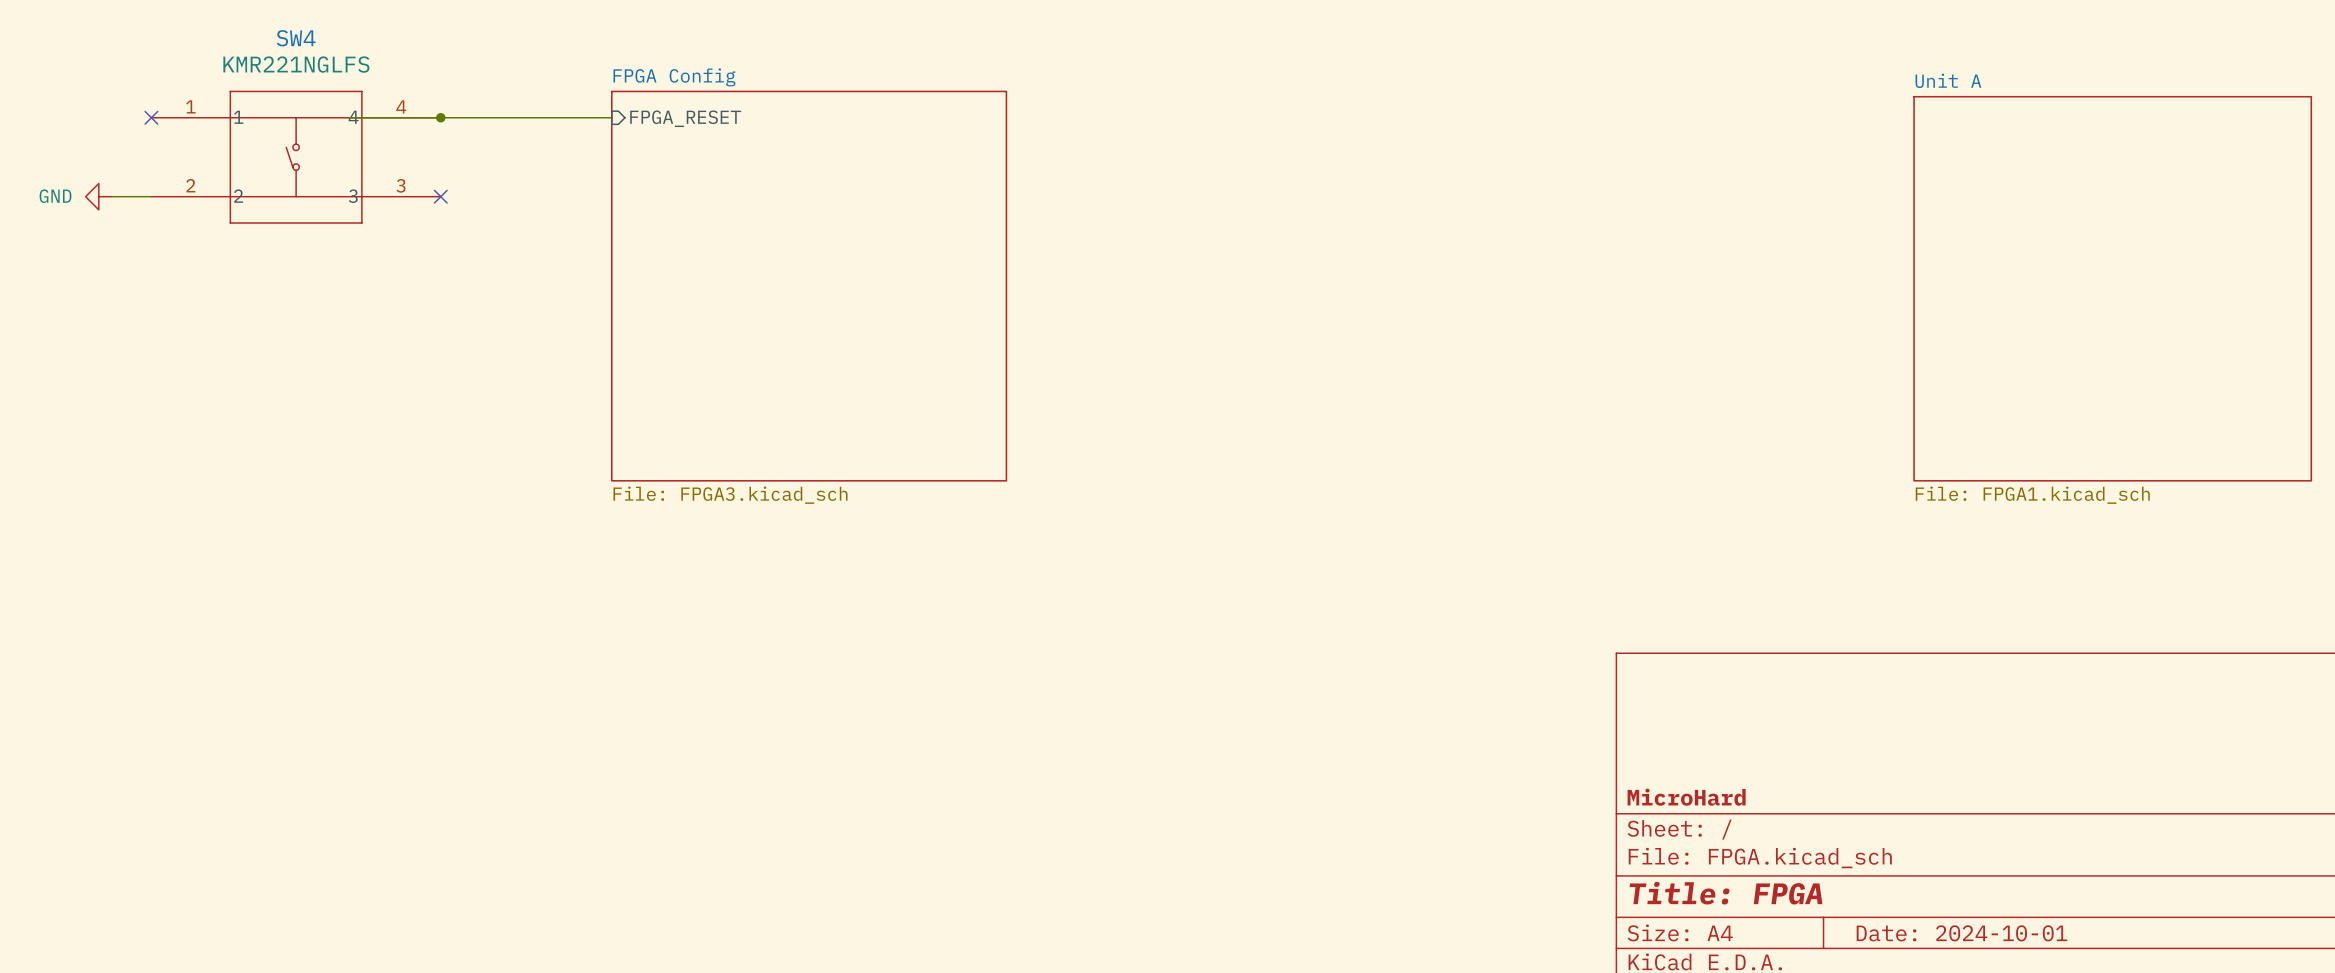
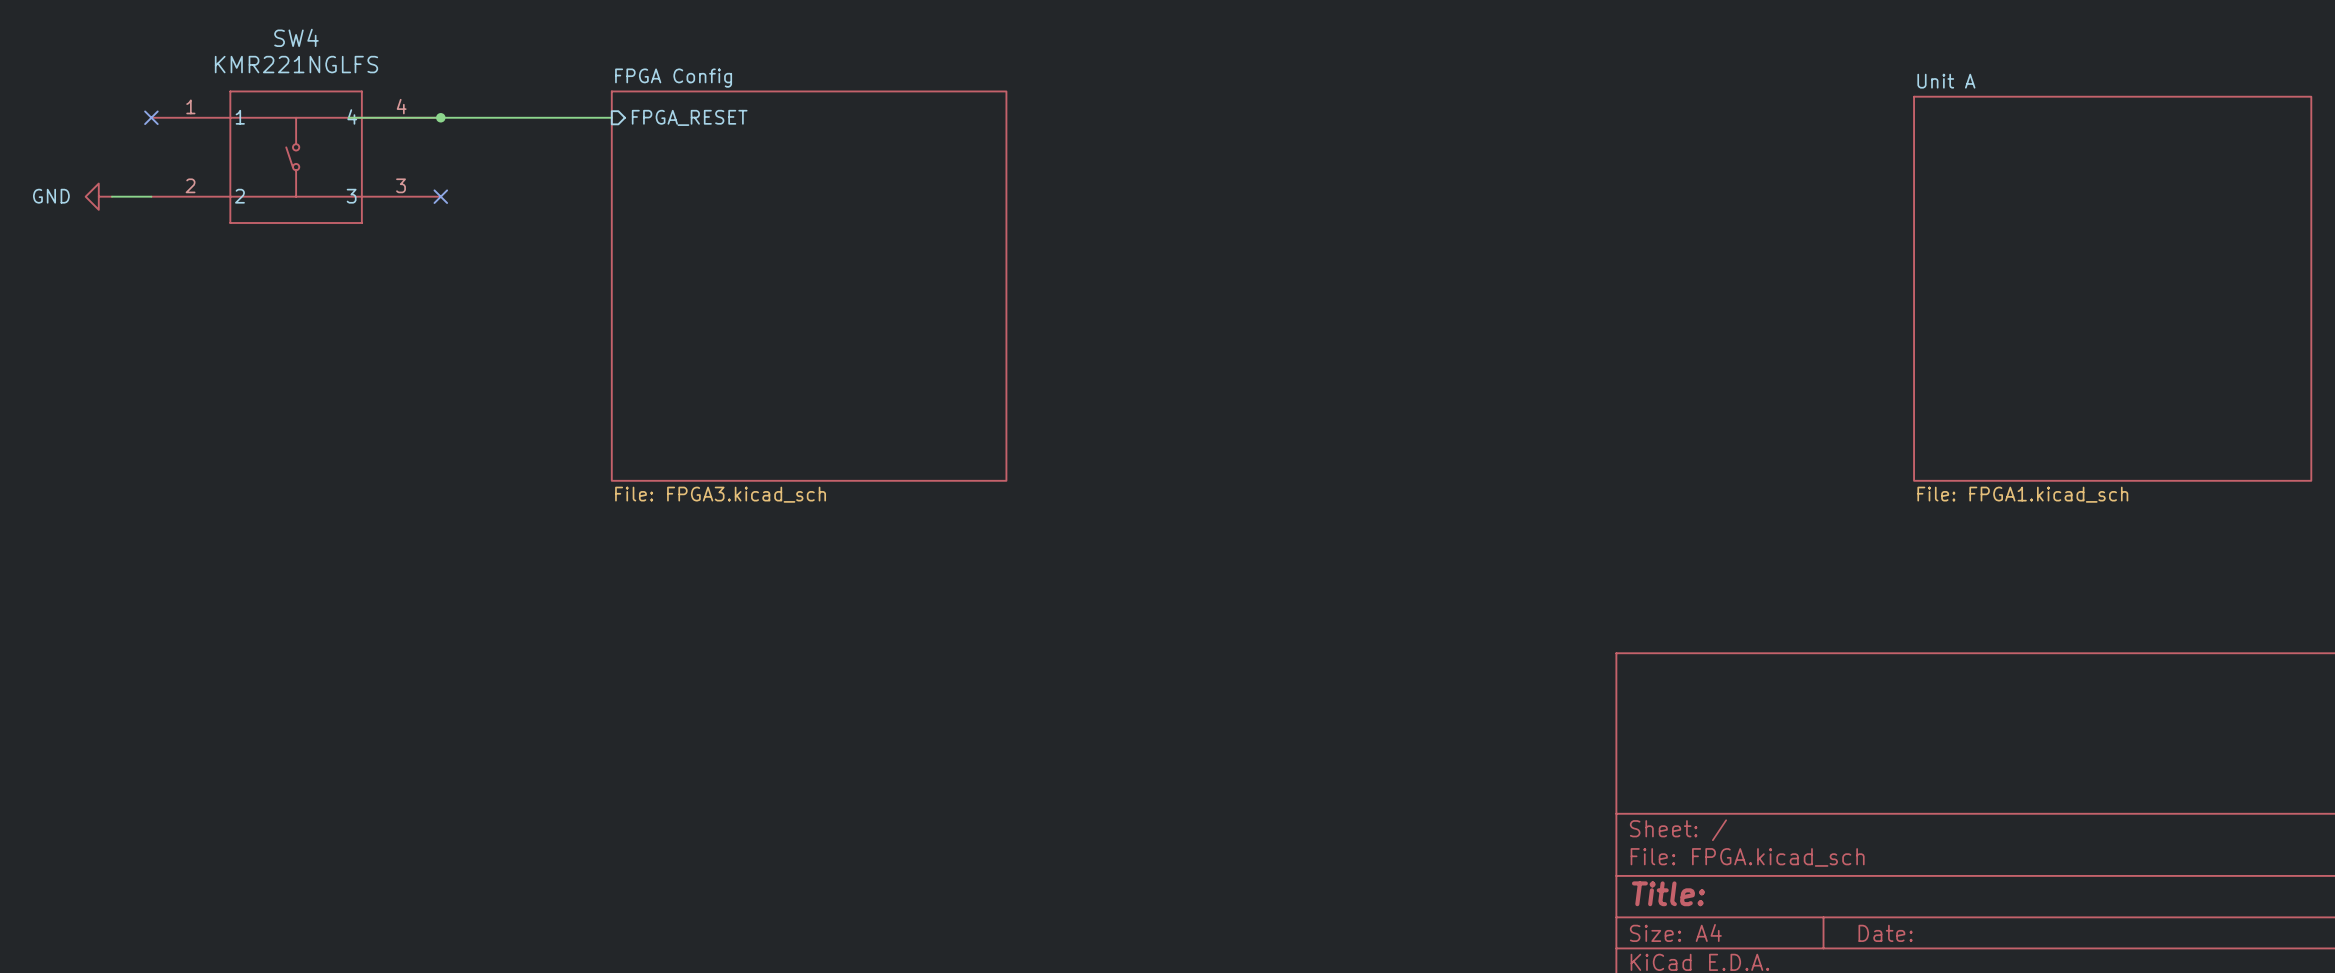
title block: MicroHard (1686, 797) -> none
title block: Title: FPGA (1726, 893) -> Title: (1668, 893)
title block: Date: 2024-10-01 (1961, 933) -> Date: (1885, 933)

